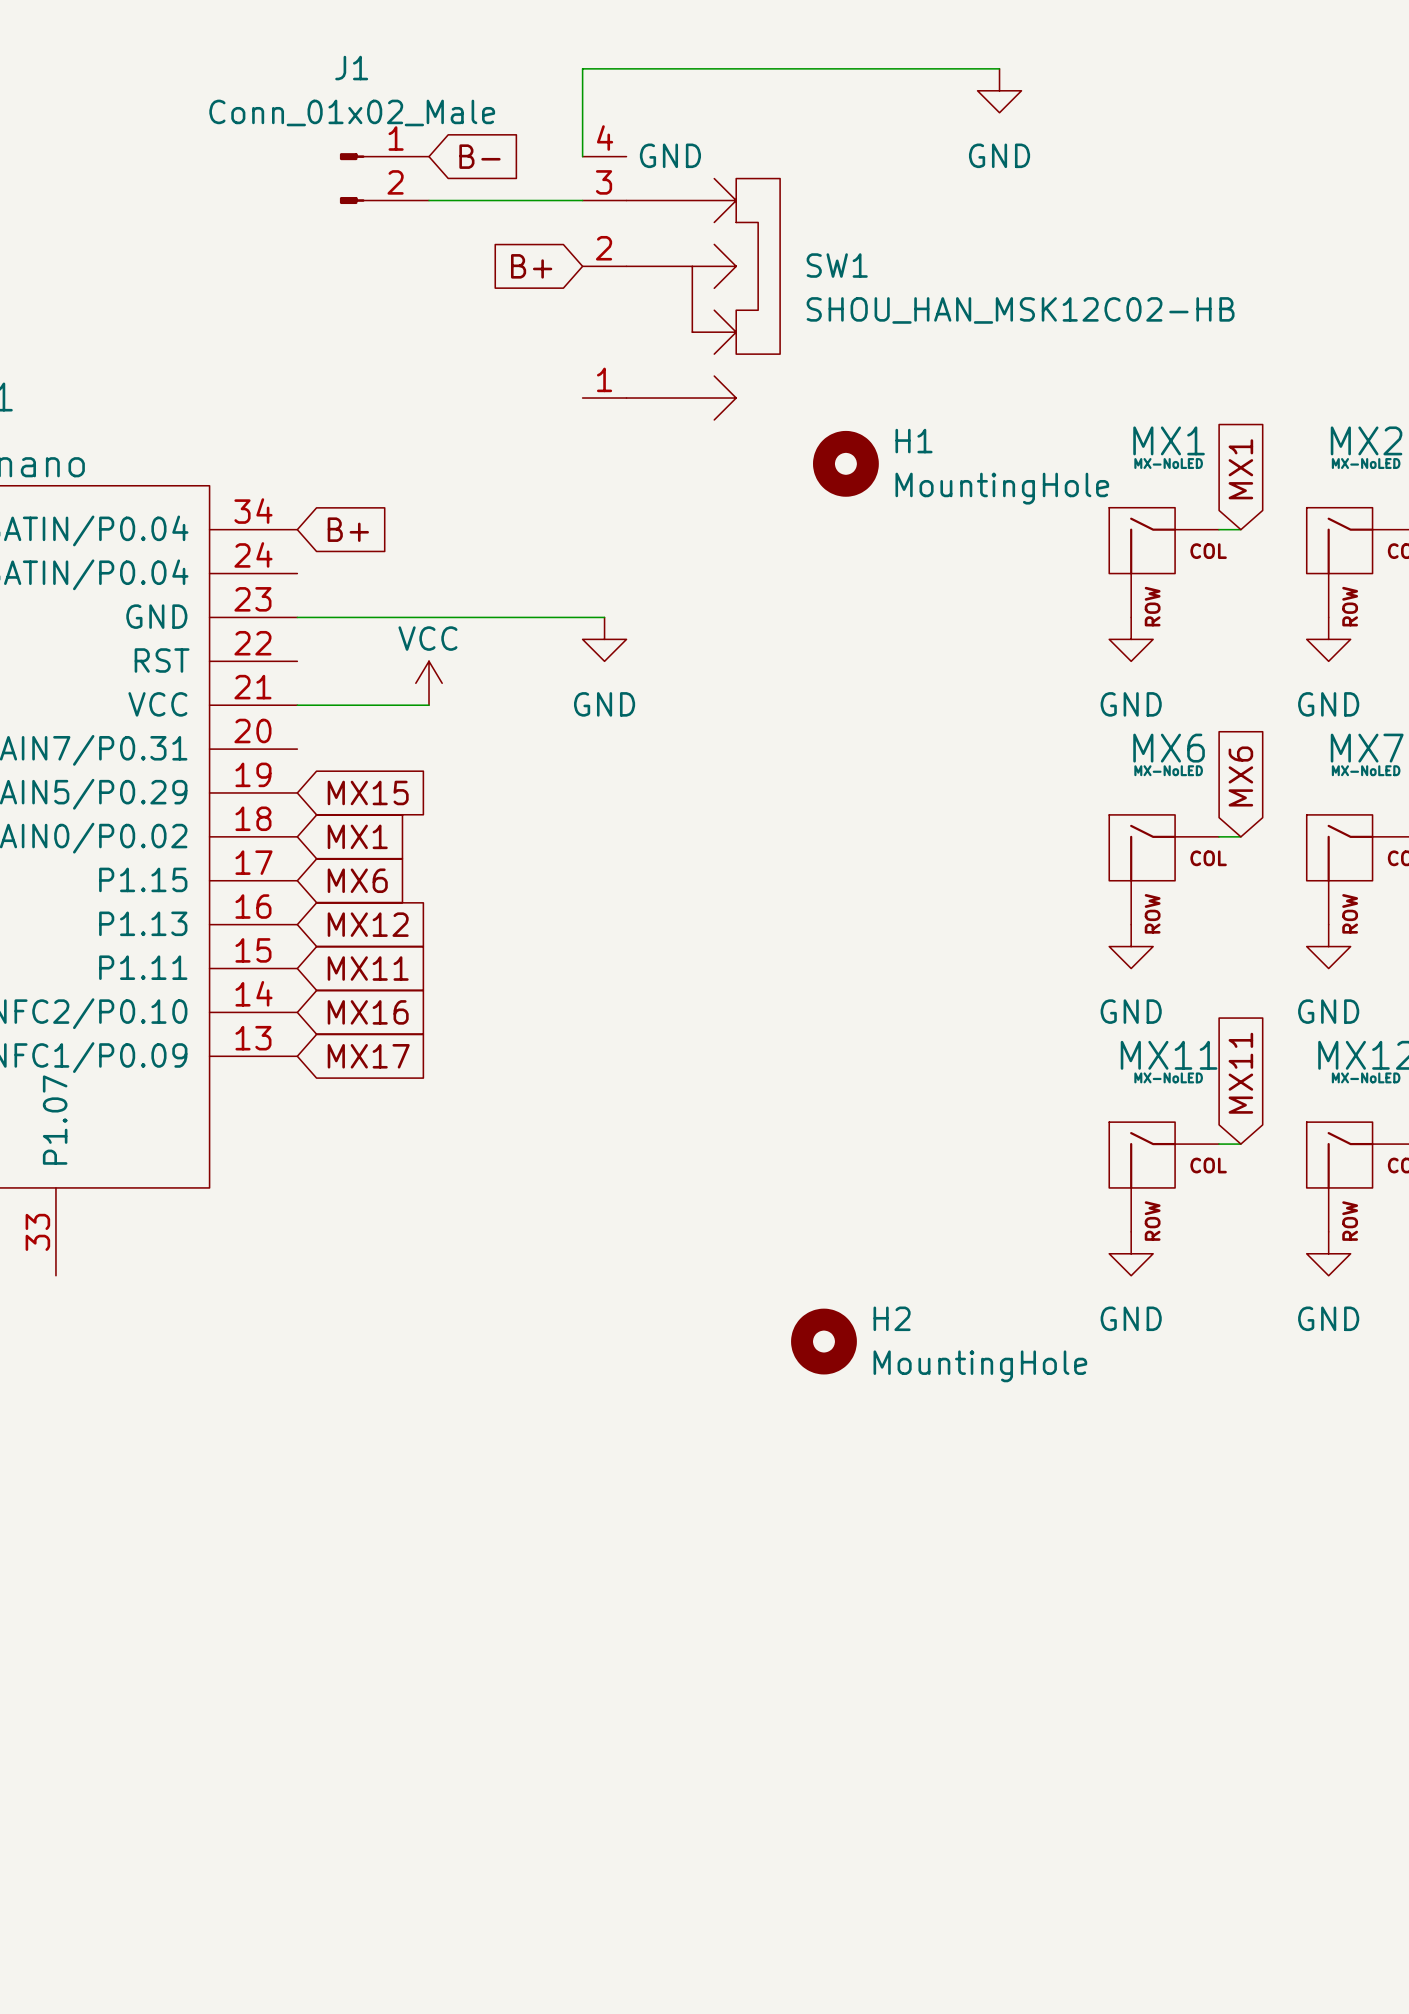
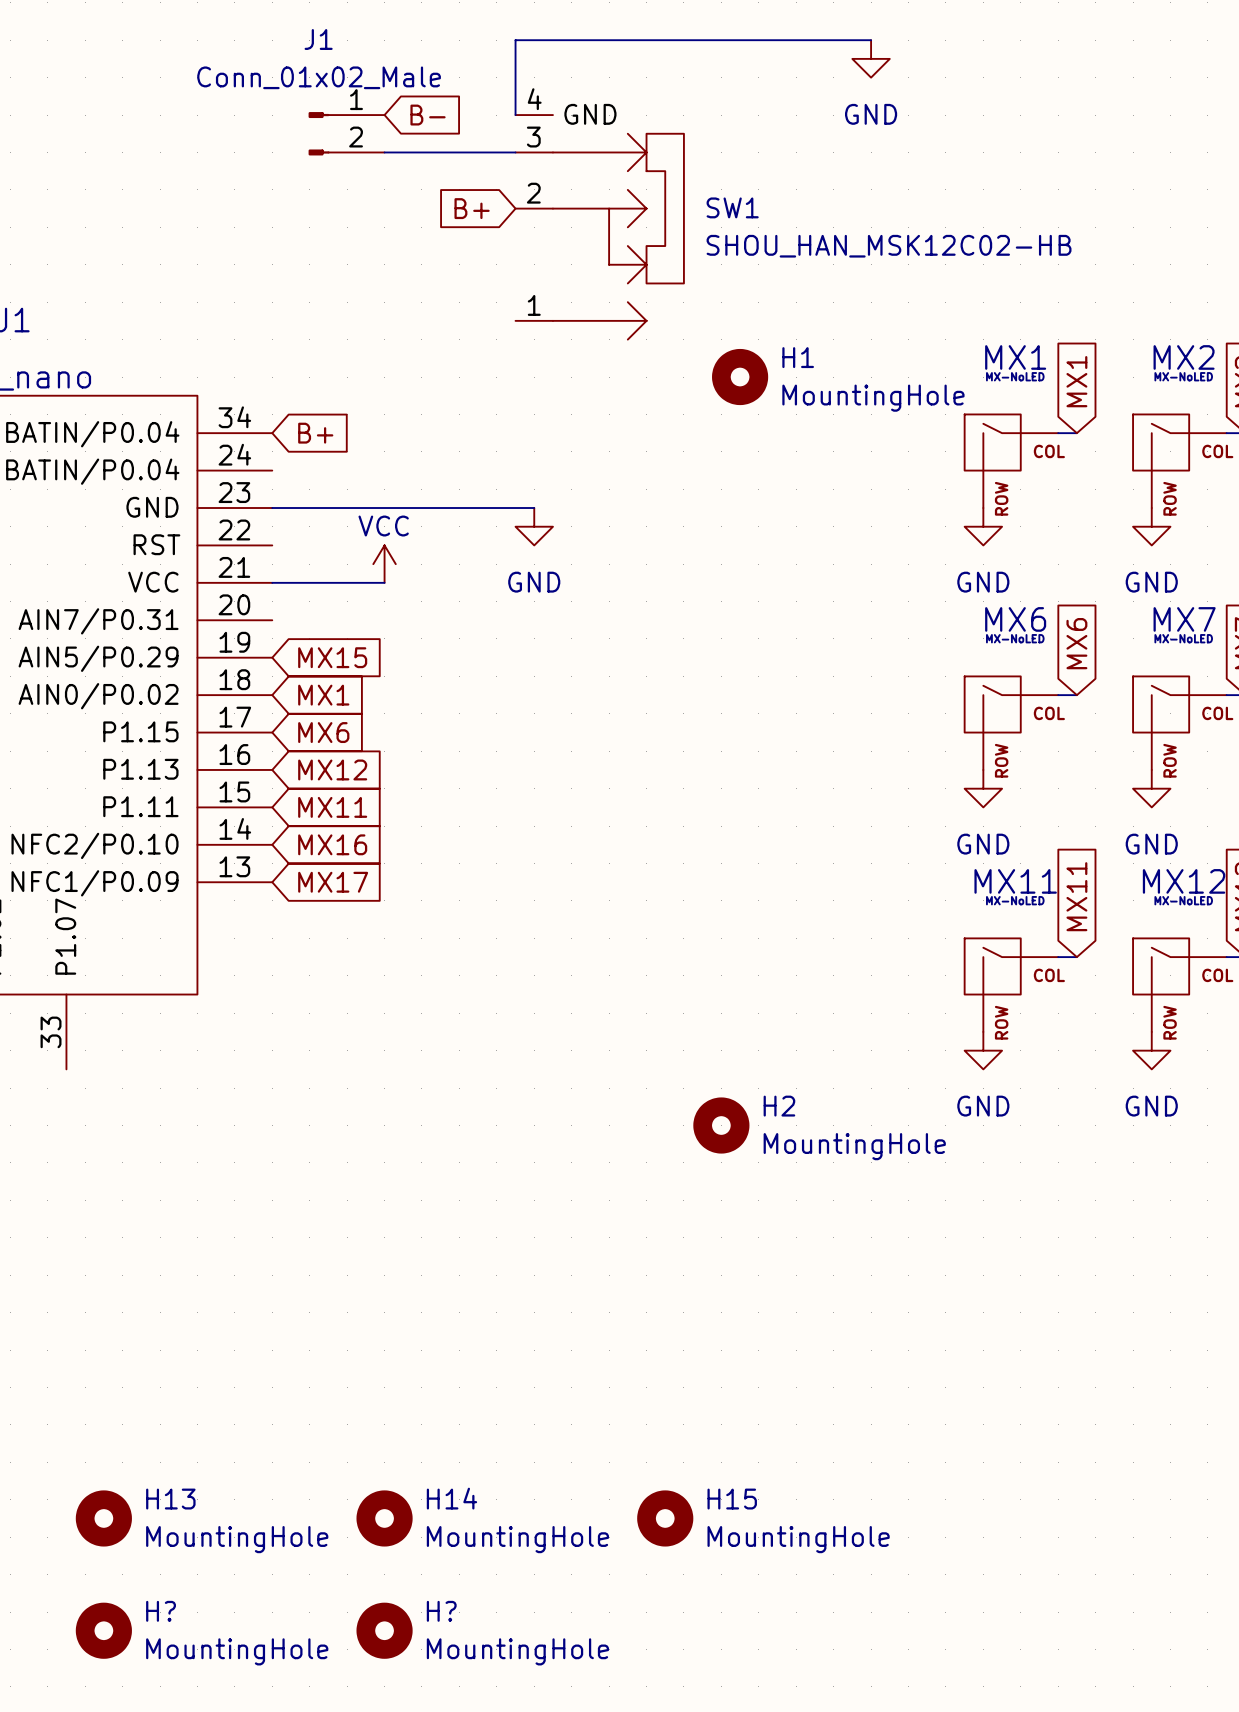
H13: none -> MountingHole (103, 1518)
H14: none -> MountingHole (384, 1518)
H15: none -> MountingHole (665, 1518)
H?: none -> MountingHole (103, 1630)
H?: none -> MountingHole (384, 1630)

